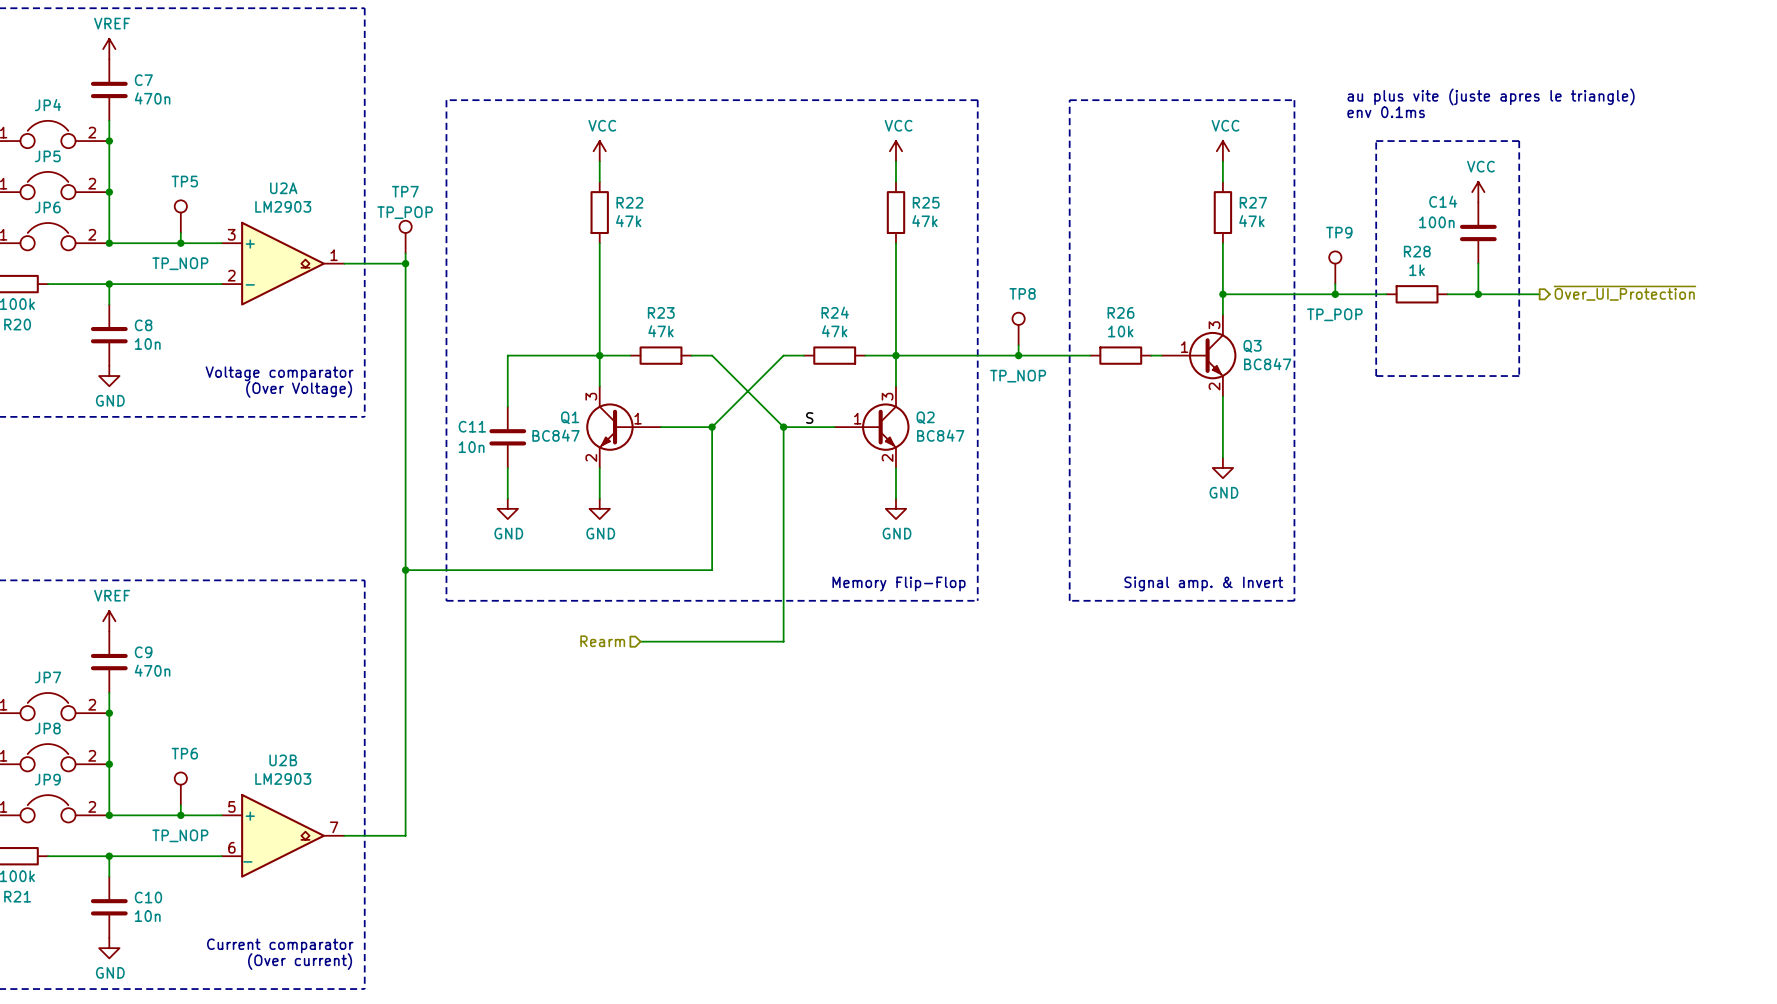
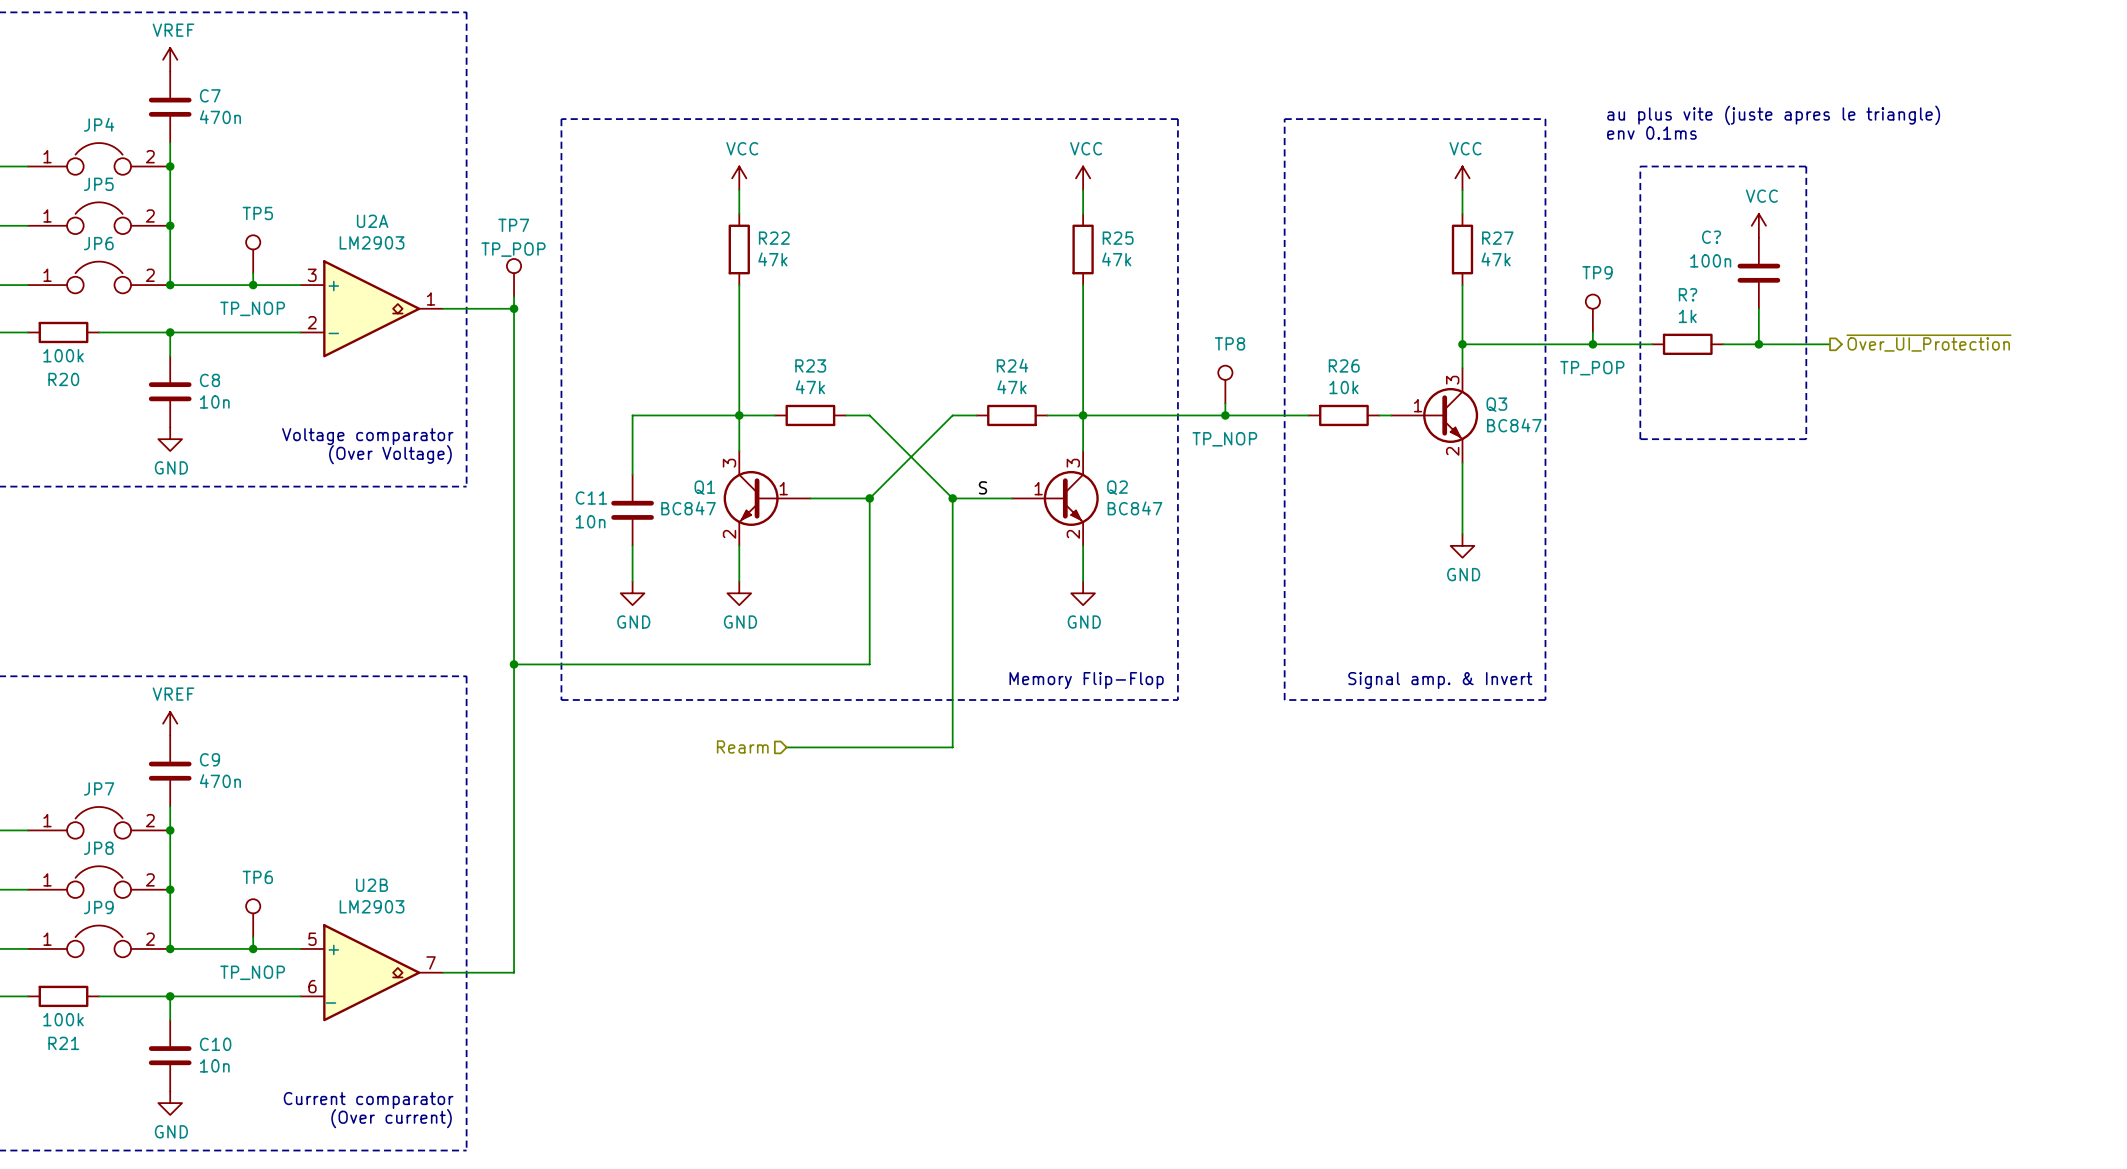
C14 name: C14 (1443, 201) -> C? (1711, 237)
R28 name: R28 (1417, 251) -> R? (1688, 294)

